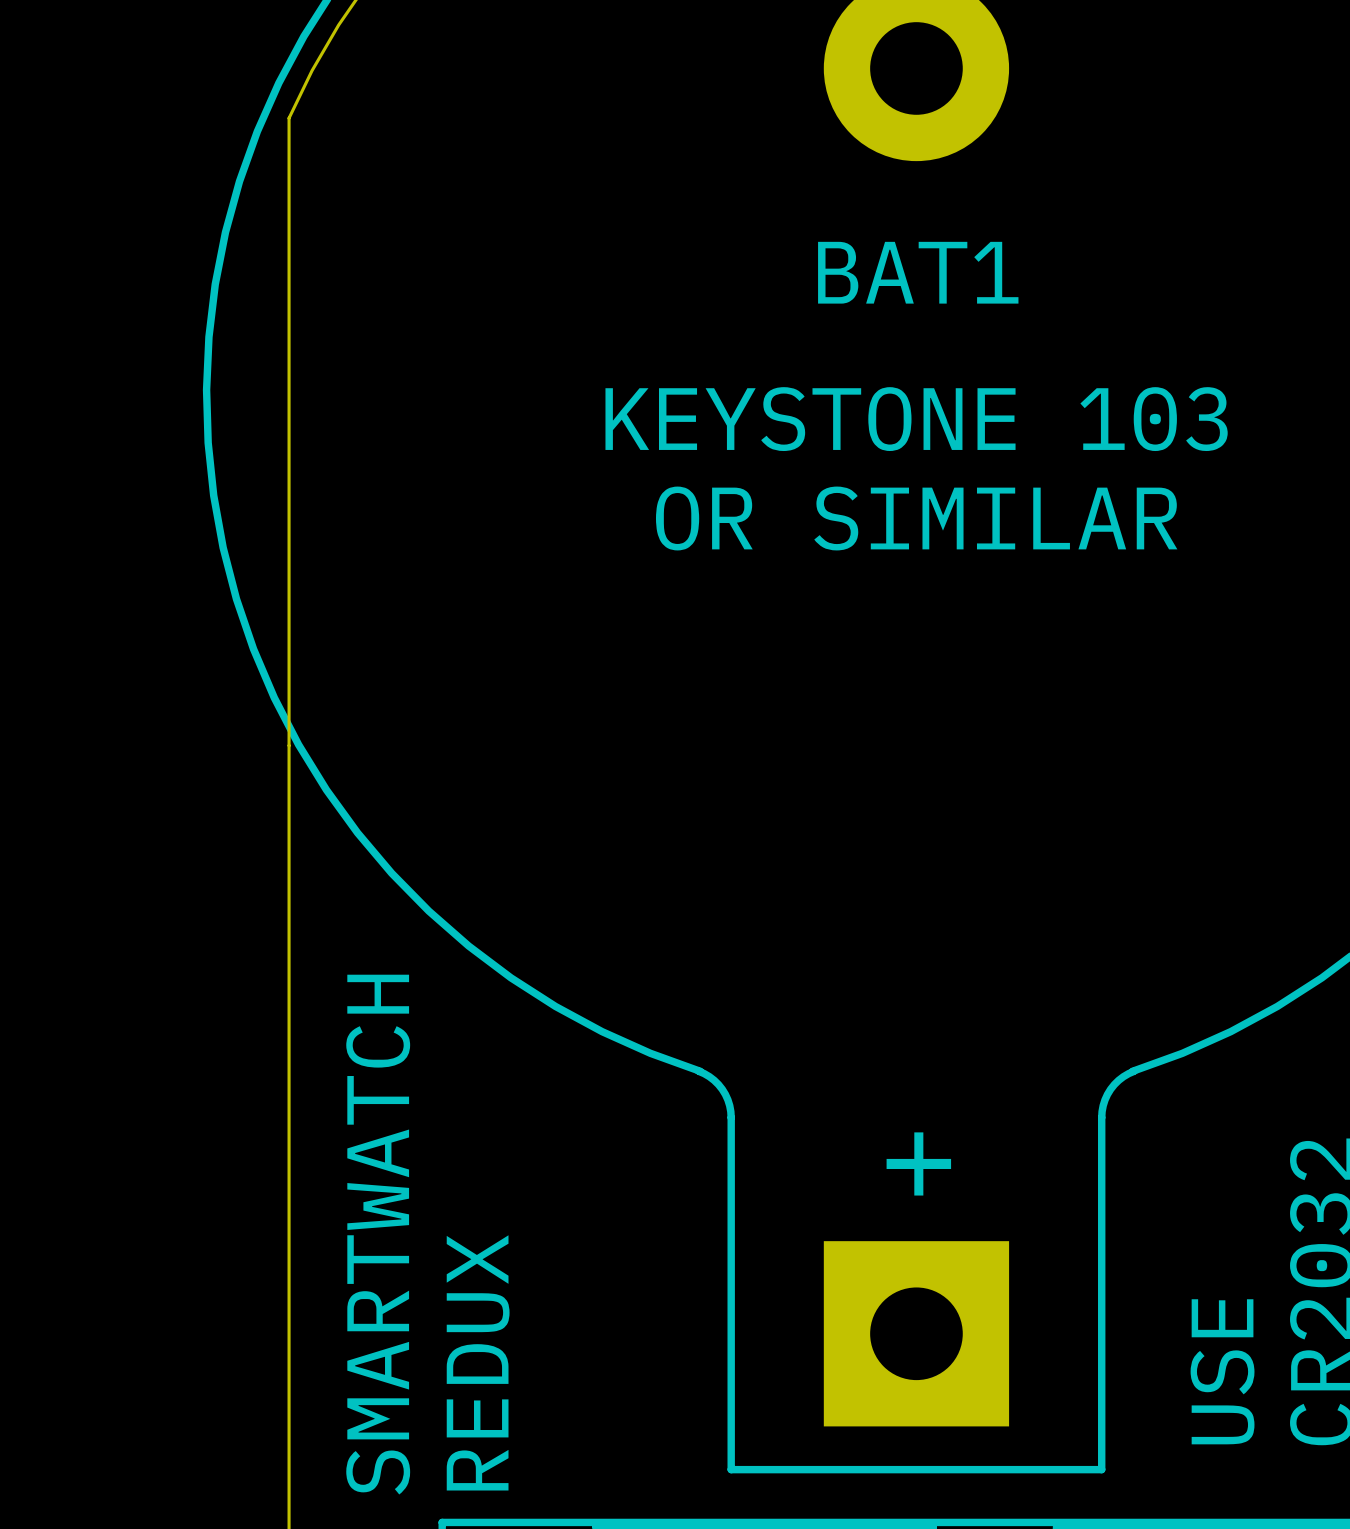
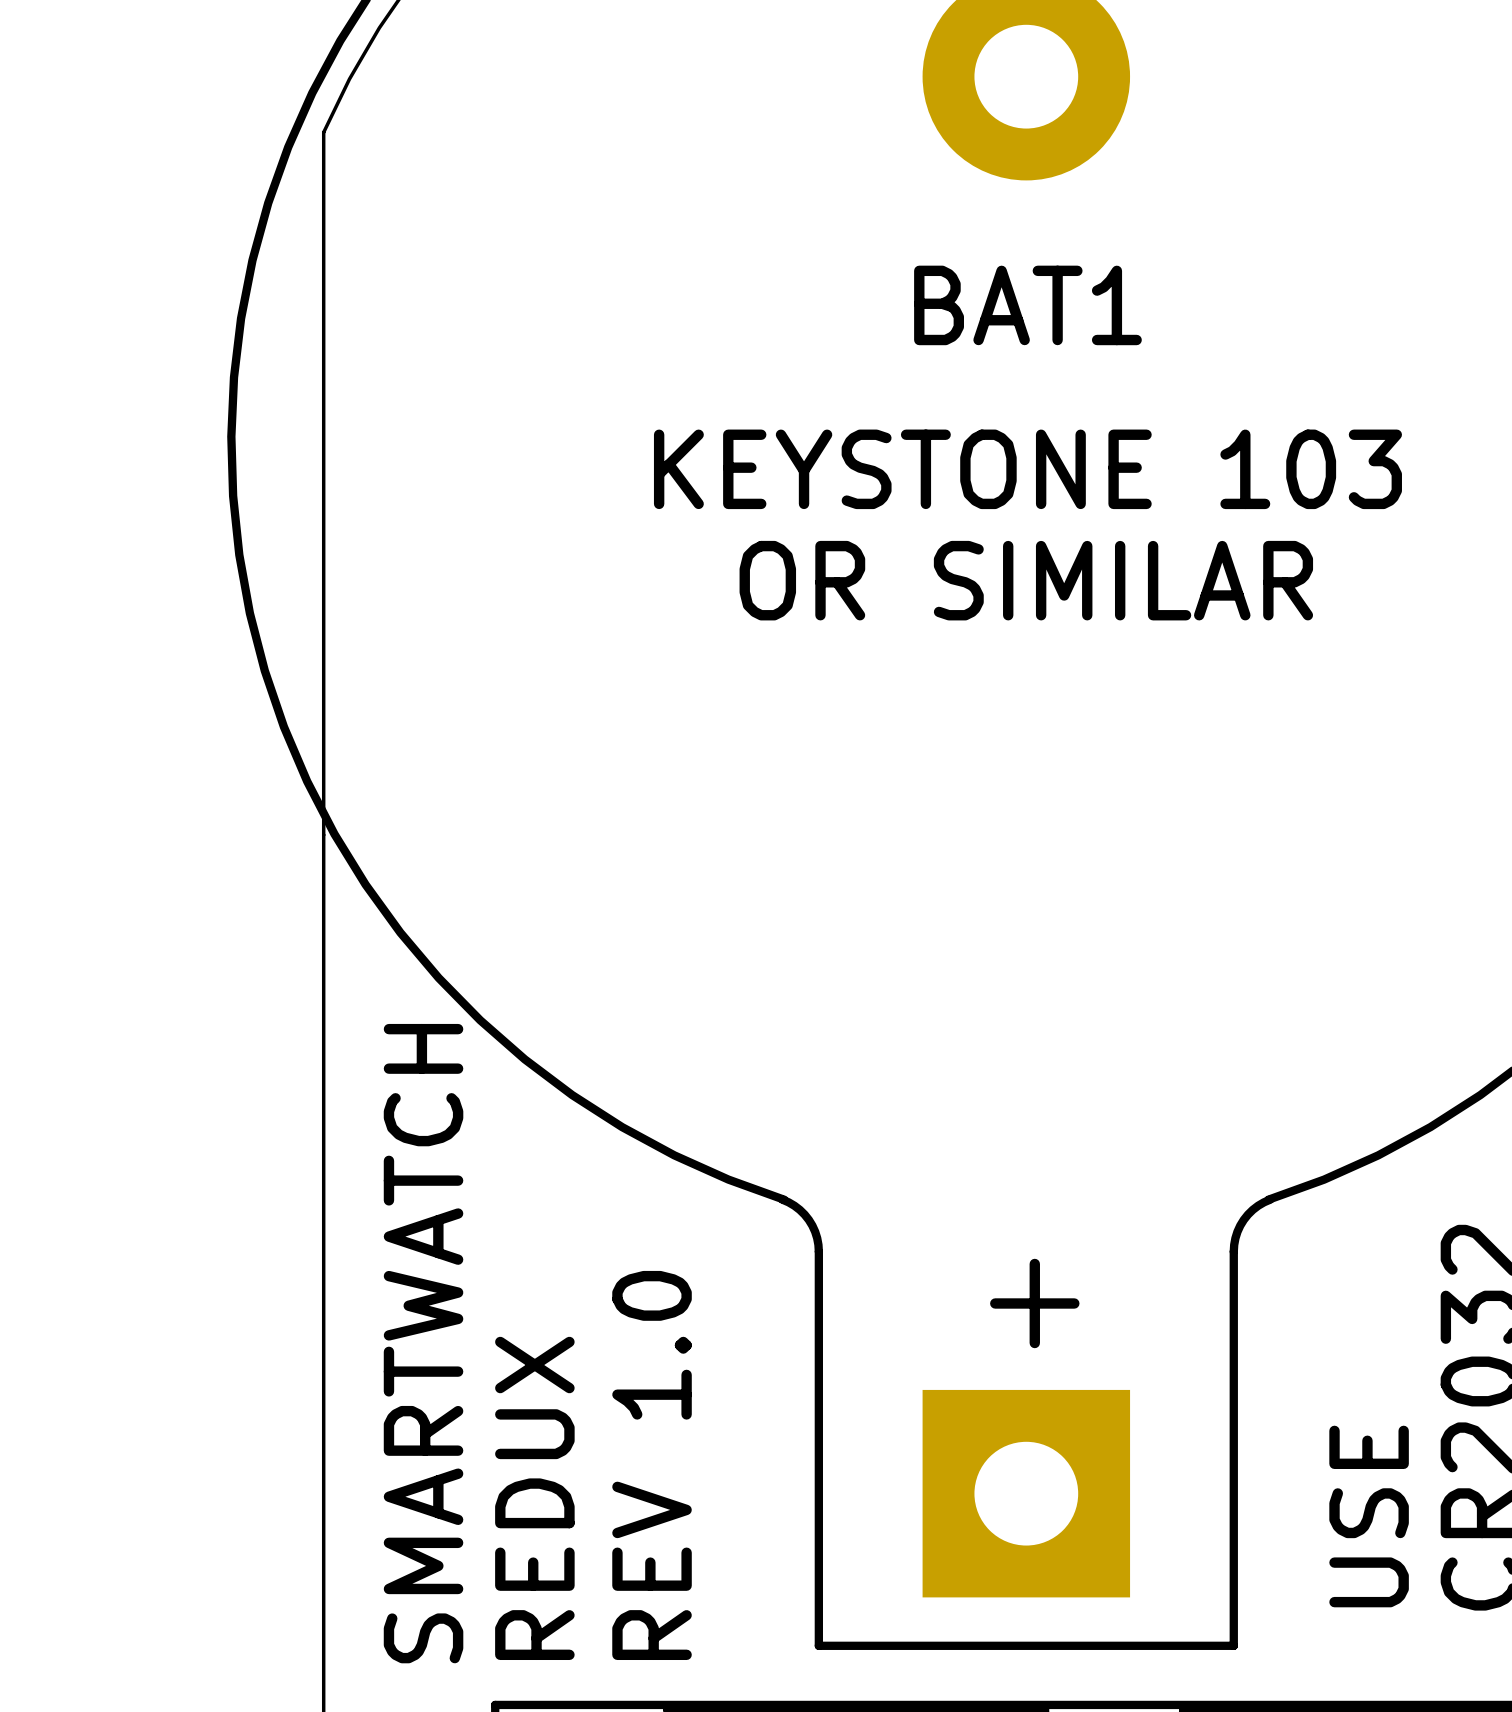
text: none -> REV 1.0 (652, 1465)

